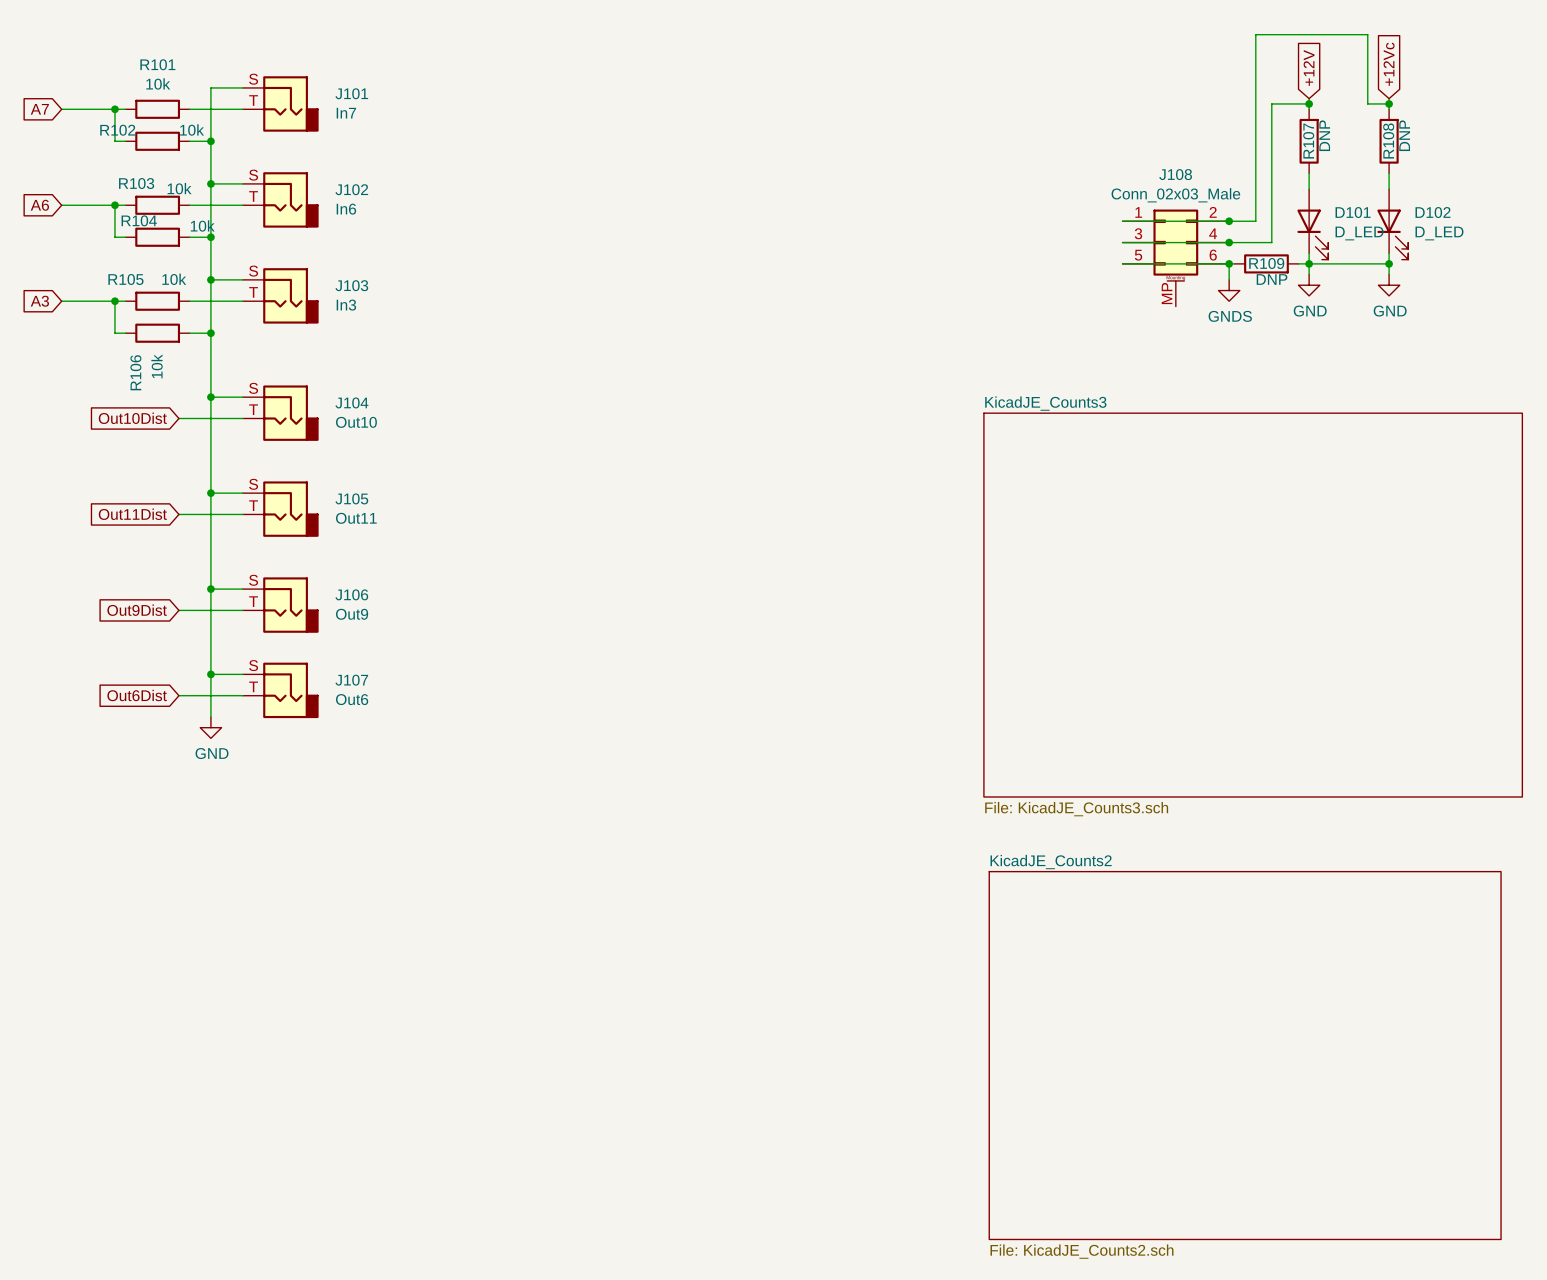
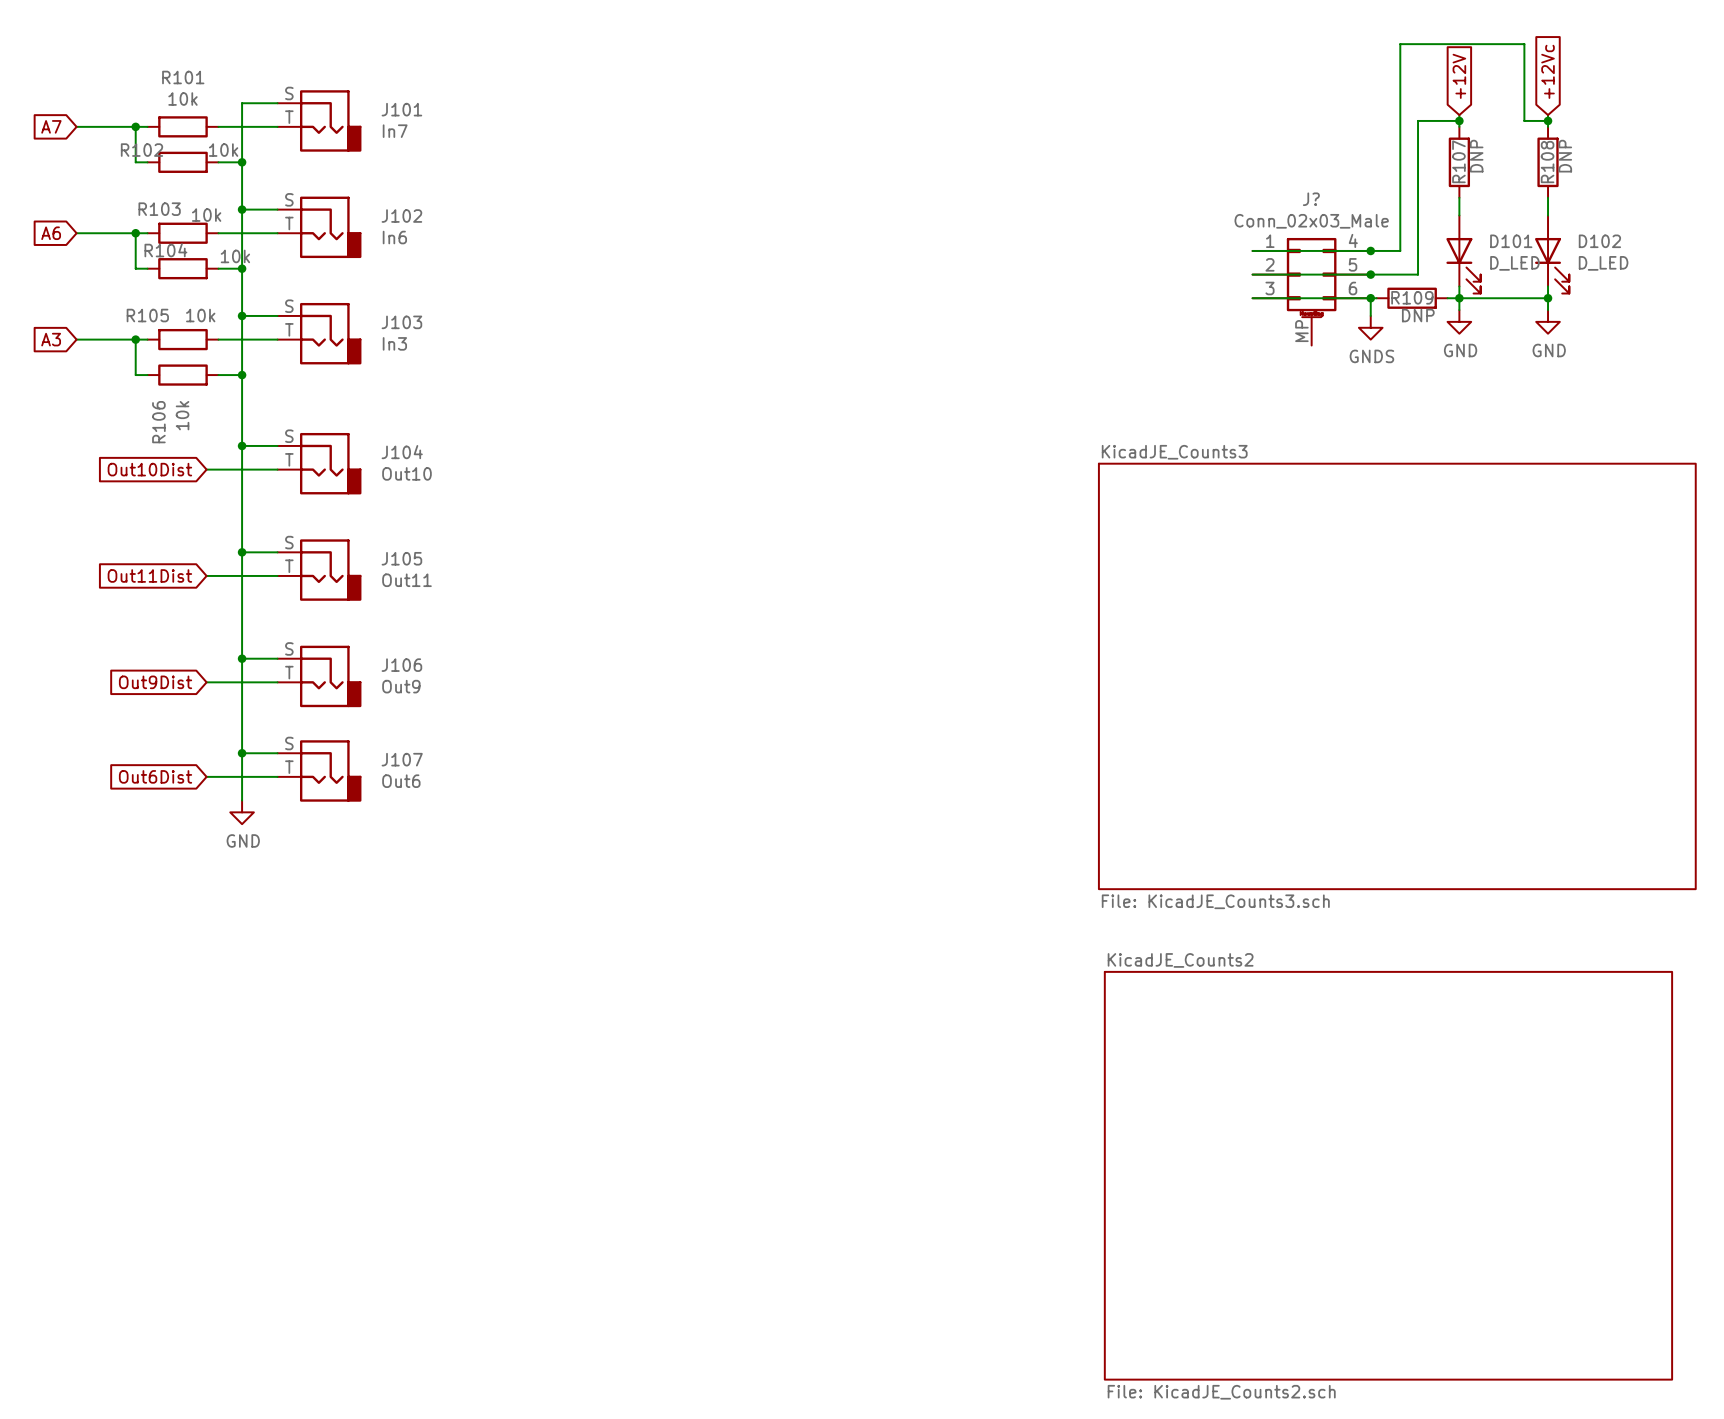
J108 name: J108 (1175, 174) -> J? (1311, 199)
J108 pin number: 2 (1213, 212) -> 4 (1353, 240)
J108 pin number: 3 (1138, 233) -> 2 (1270, 264)
J108 pin number: 4 (1213, 233) -> 5 (1353, 264)
J108 pin number: 5 (1138, 255) -> 3 (1270, 288)

